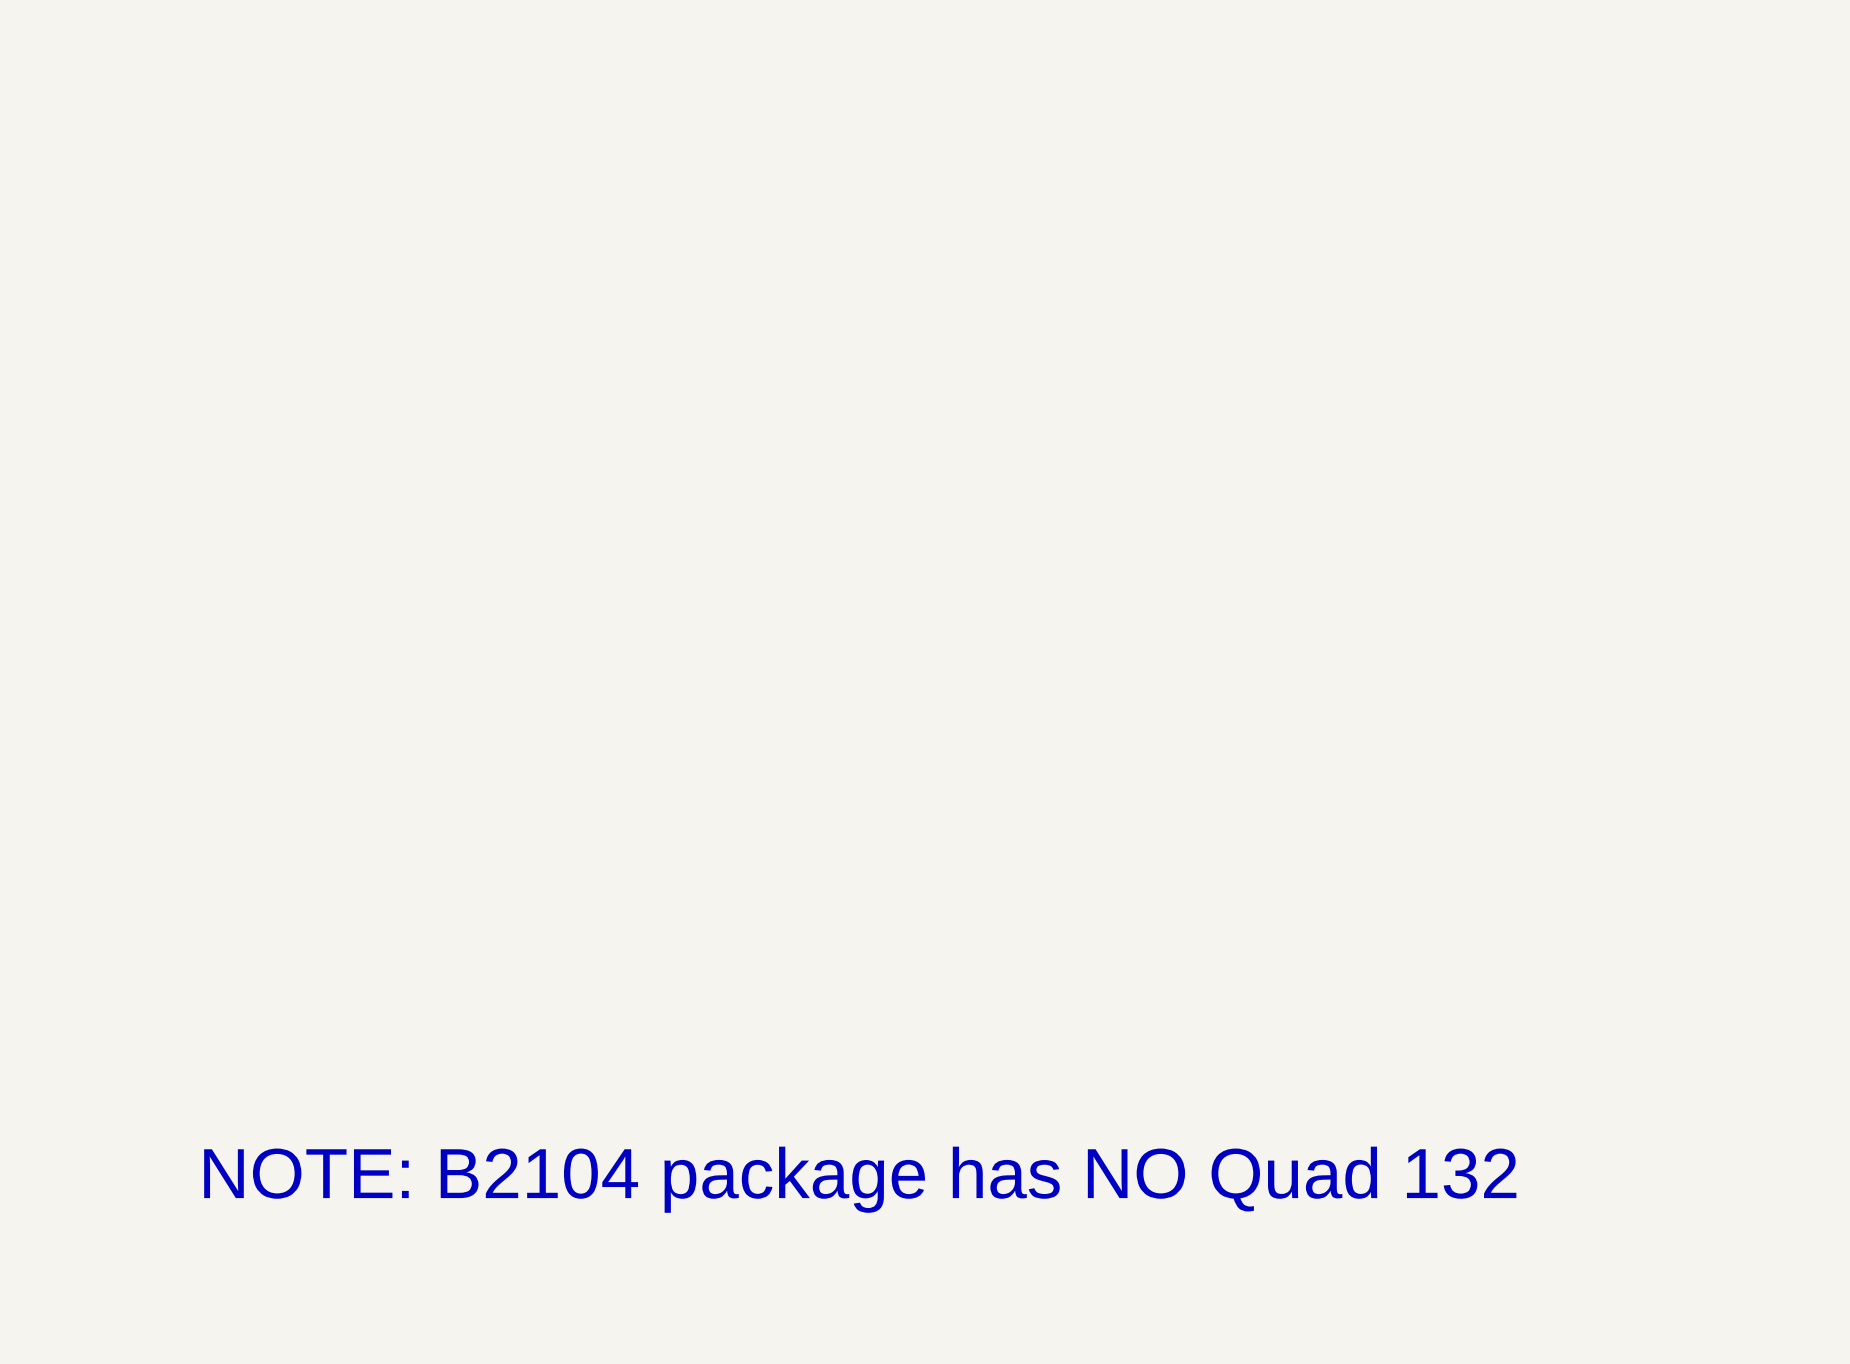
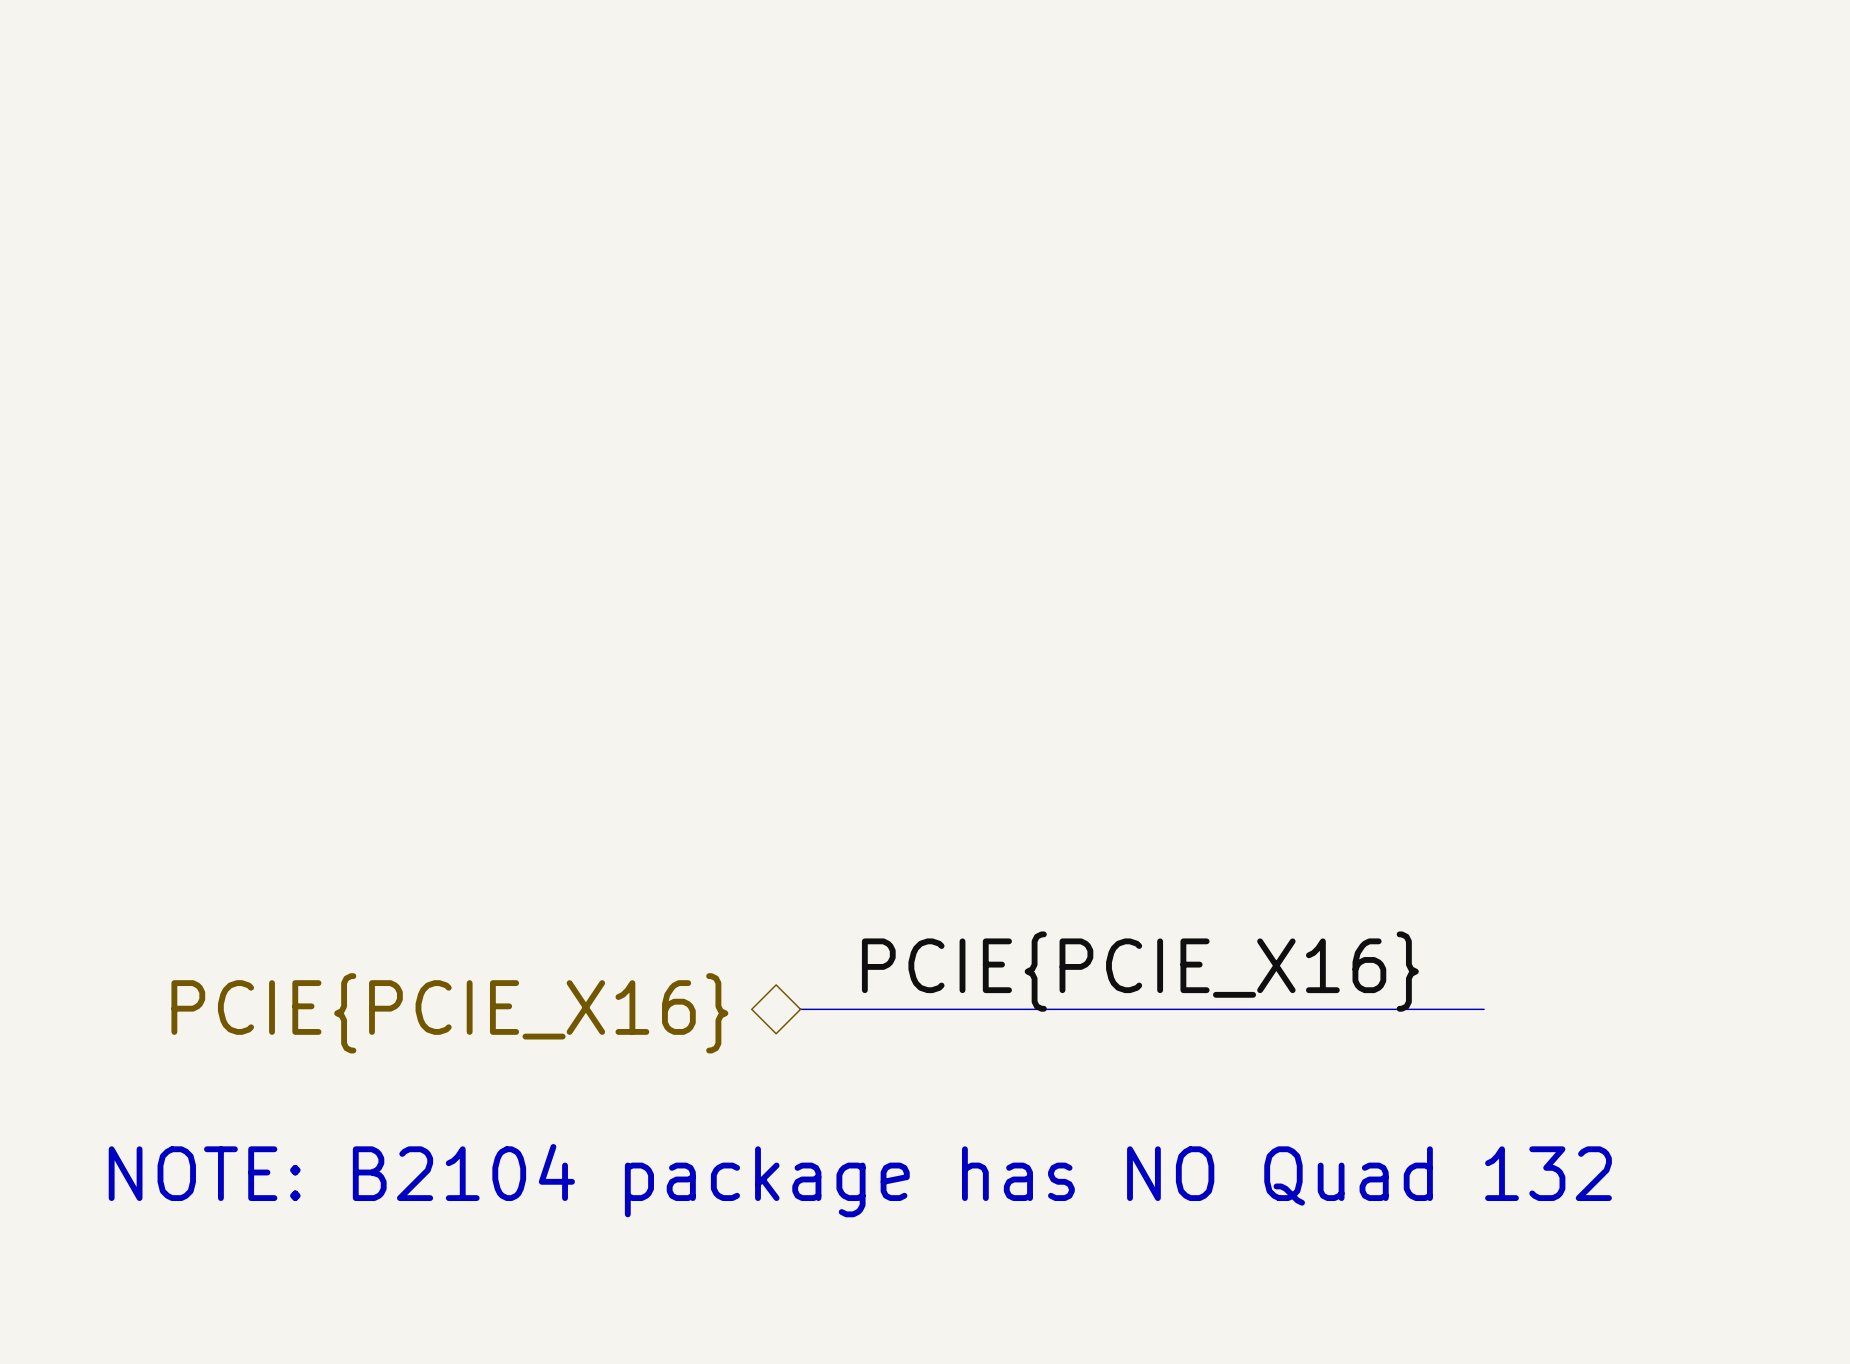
label: none -> PCIE{PCIE_X16} (1140, 971)
bus: none -> (800, 1009) (1484, 1009)
hierarchical label: none -> PCIE{PCIE_X16} (449, 1013)

